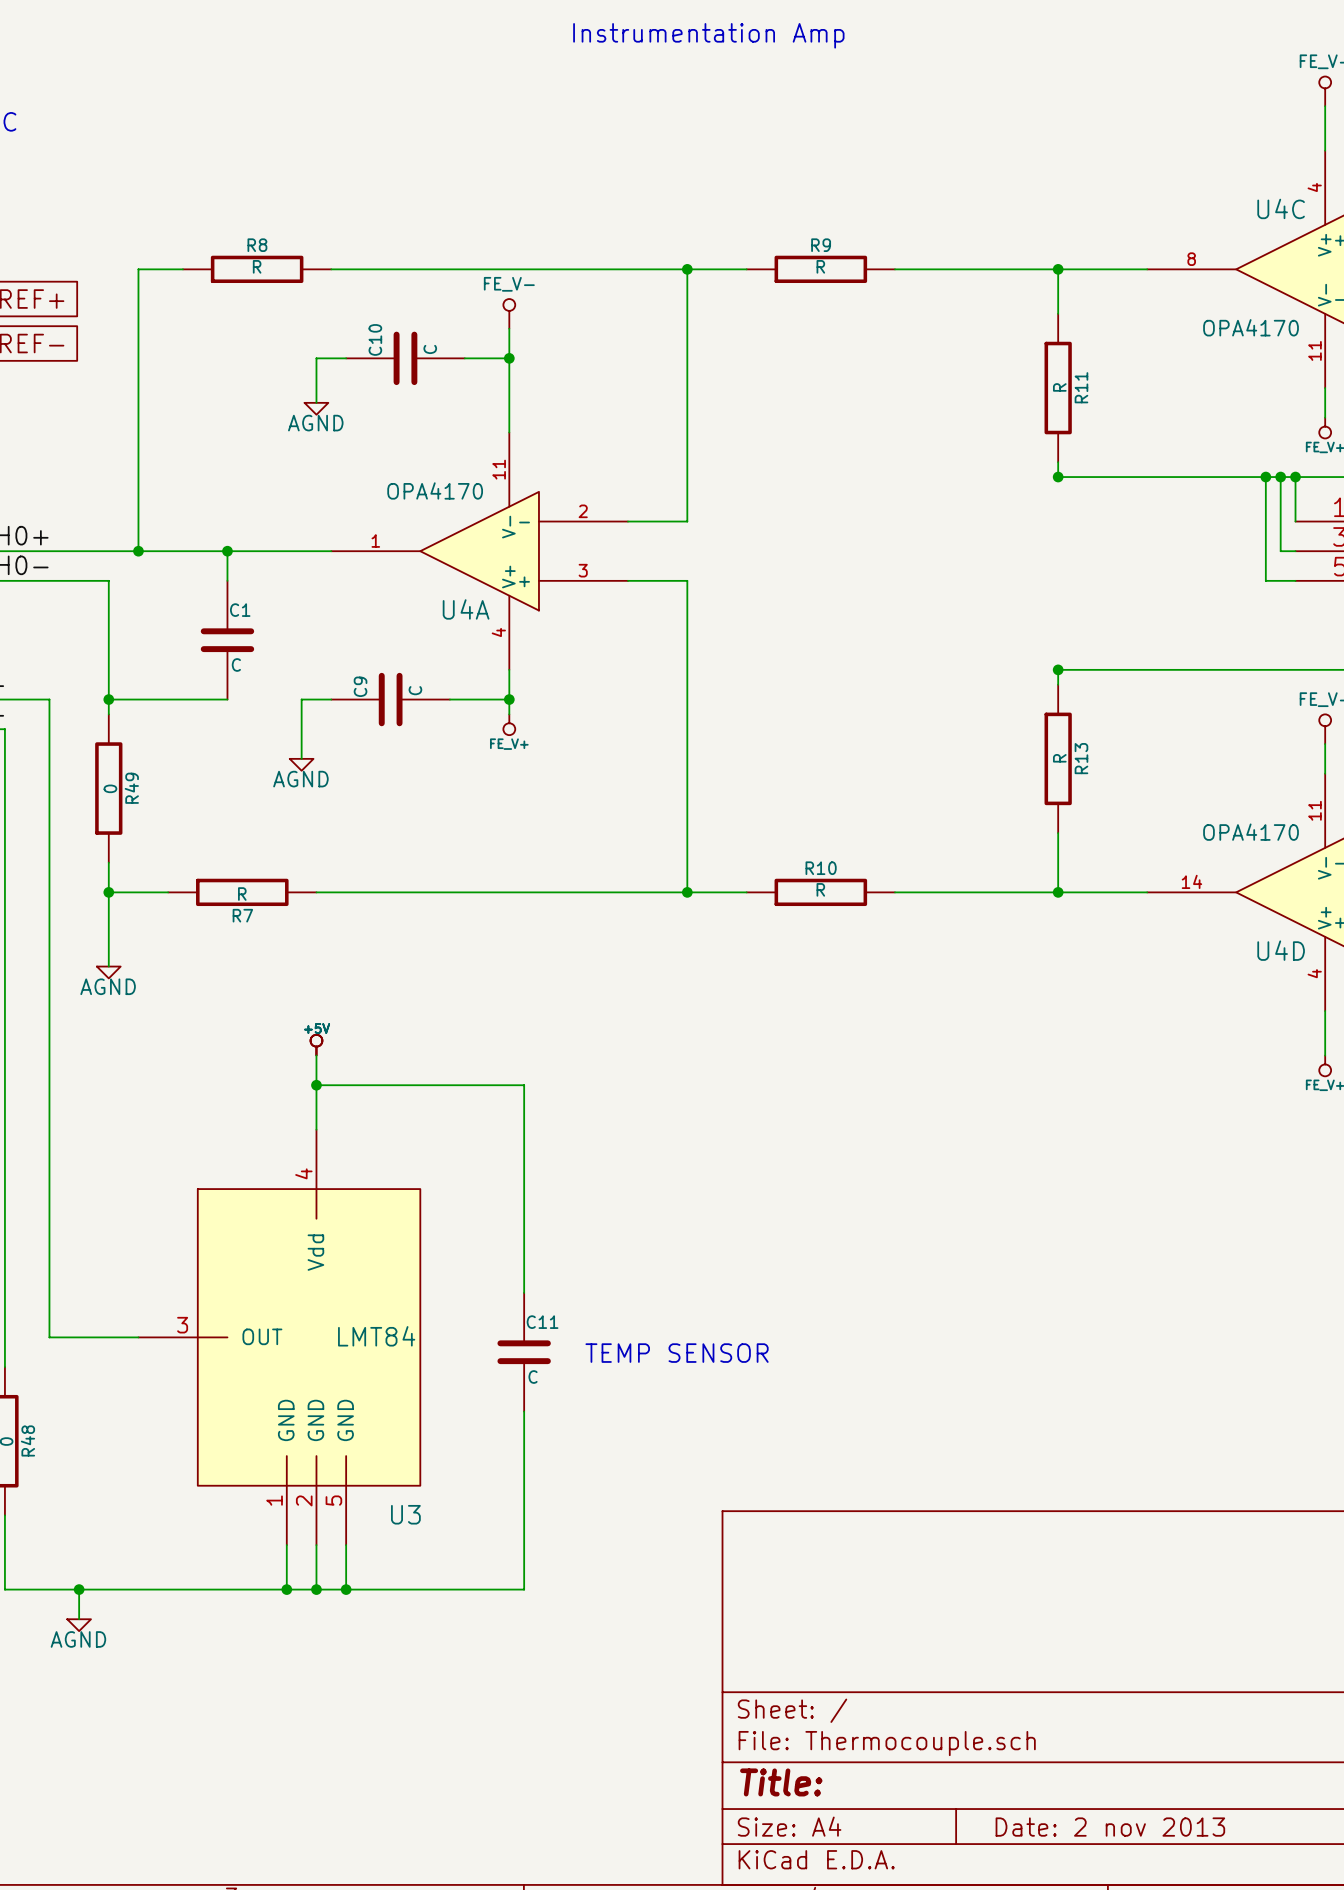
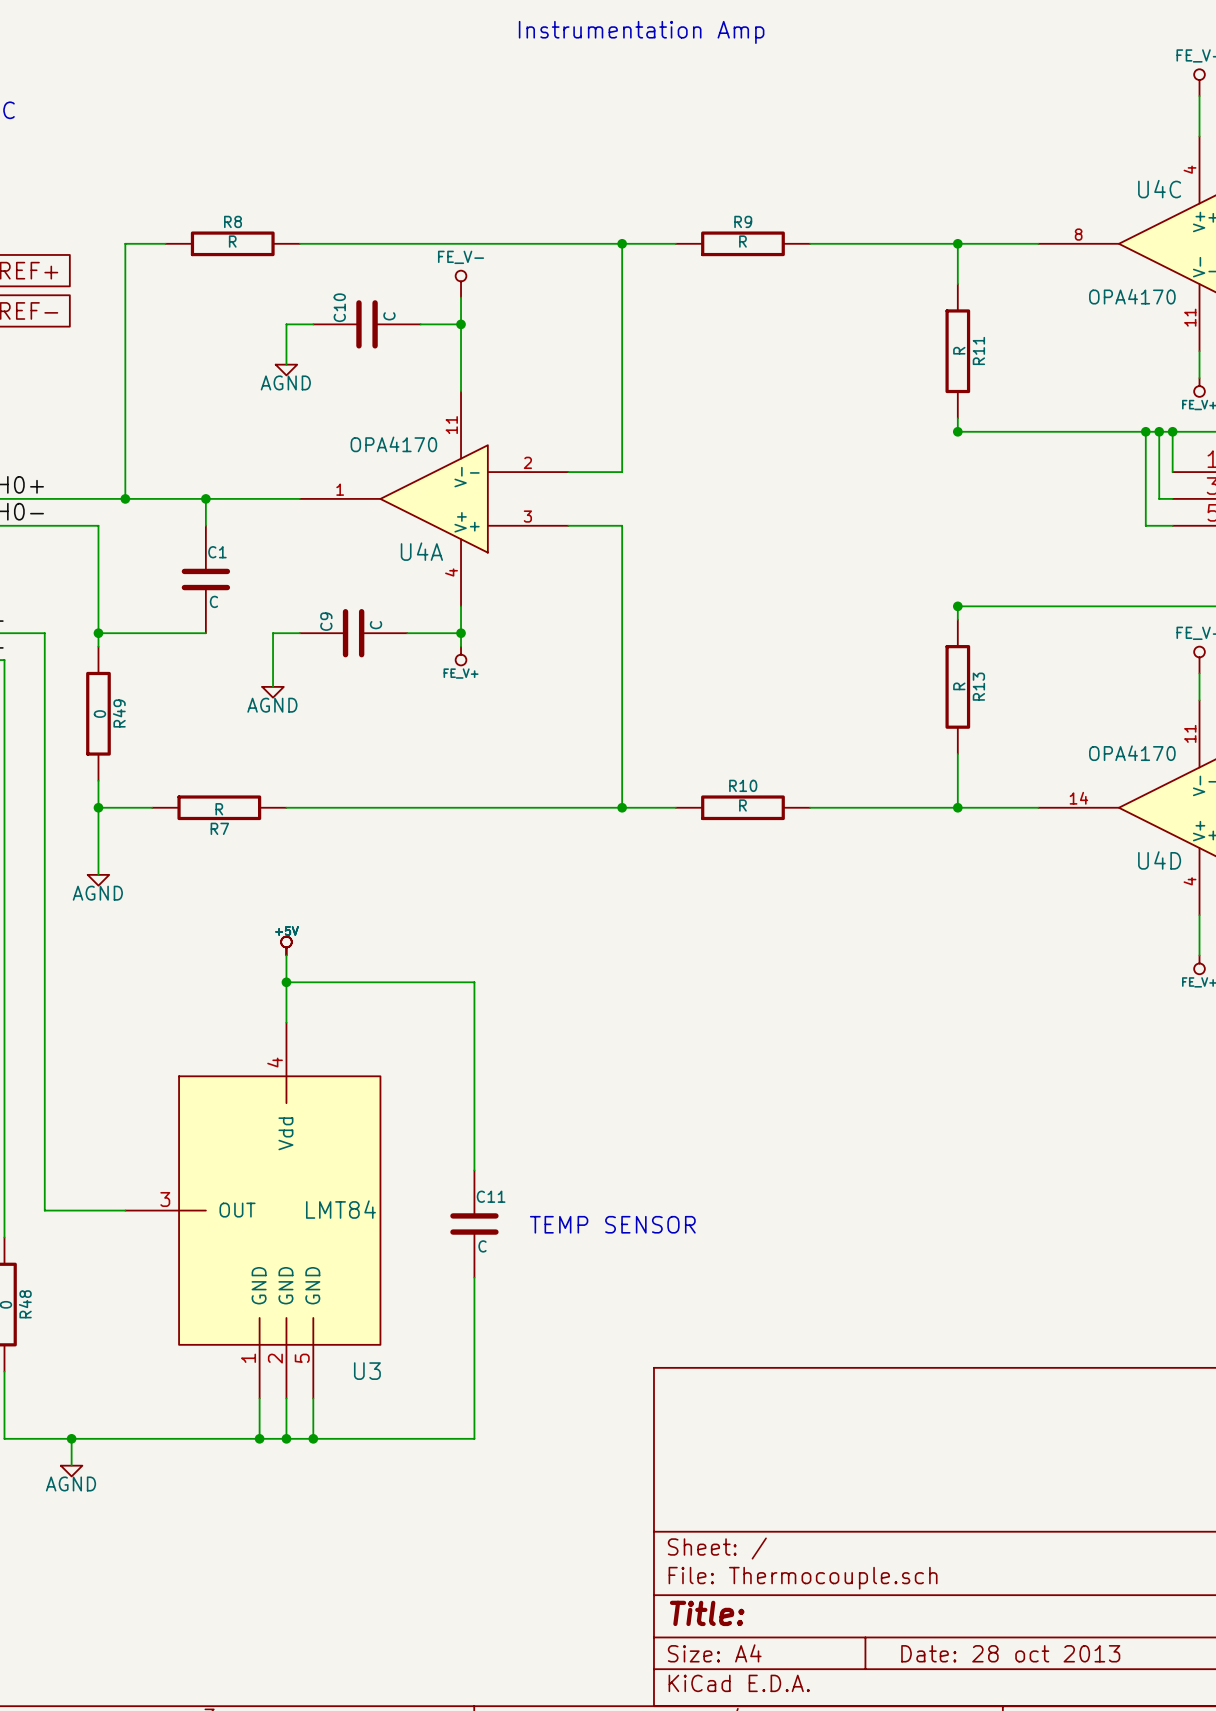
title block: Date: 2 nov 2013 (1110, 1827) -> Date: 28 oct 2013 (1010, 1653)

